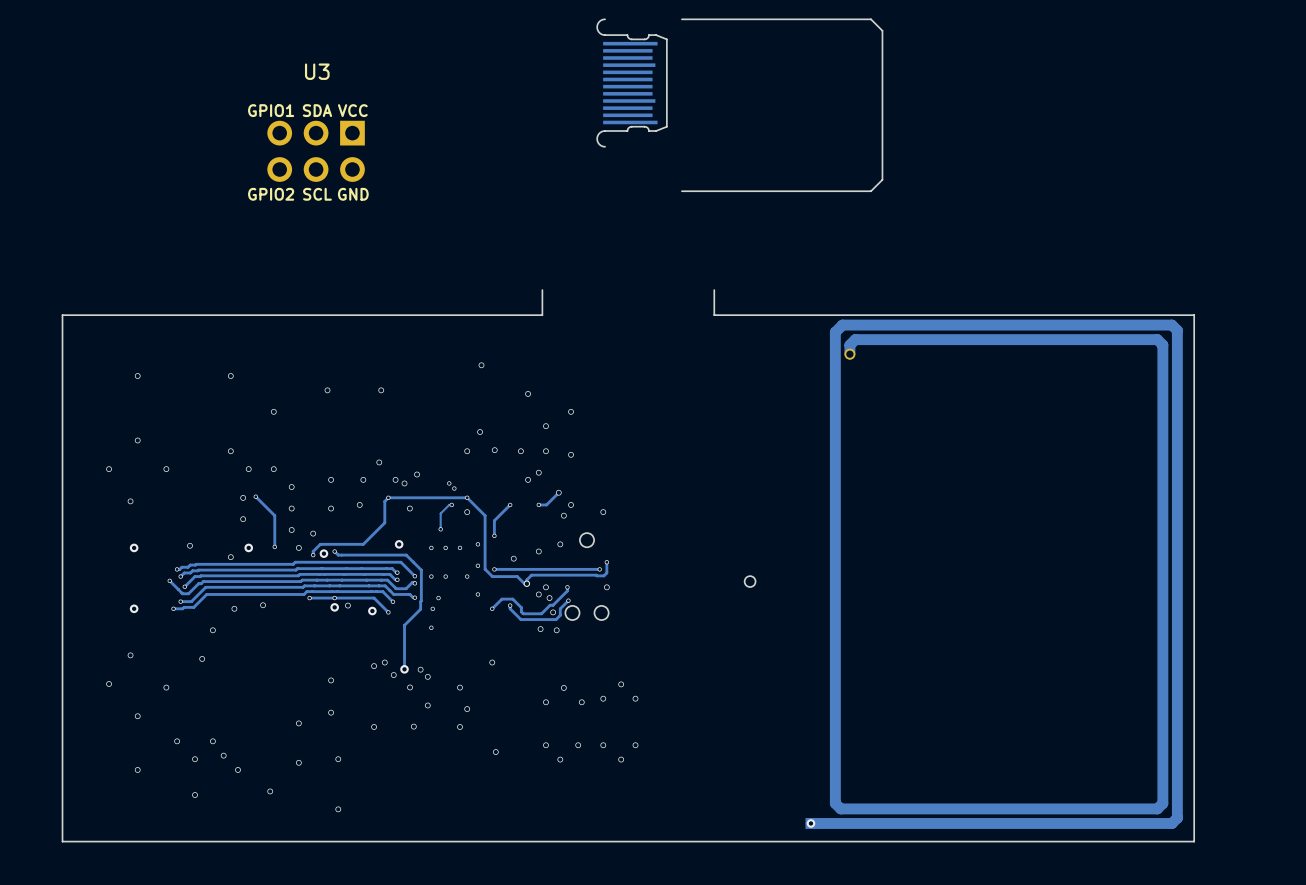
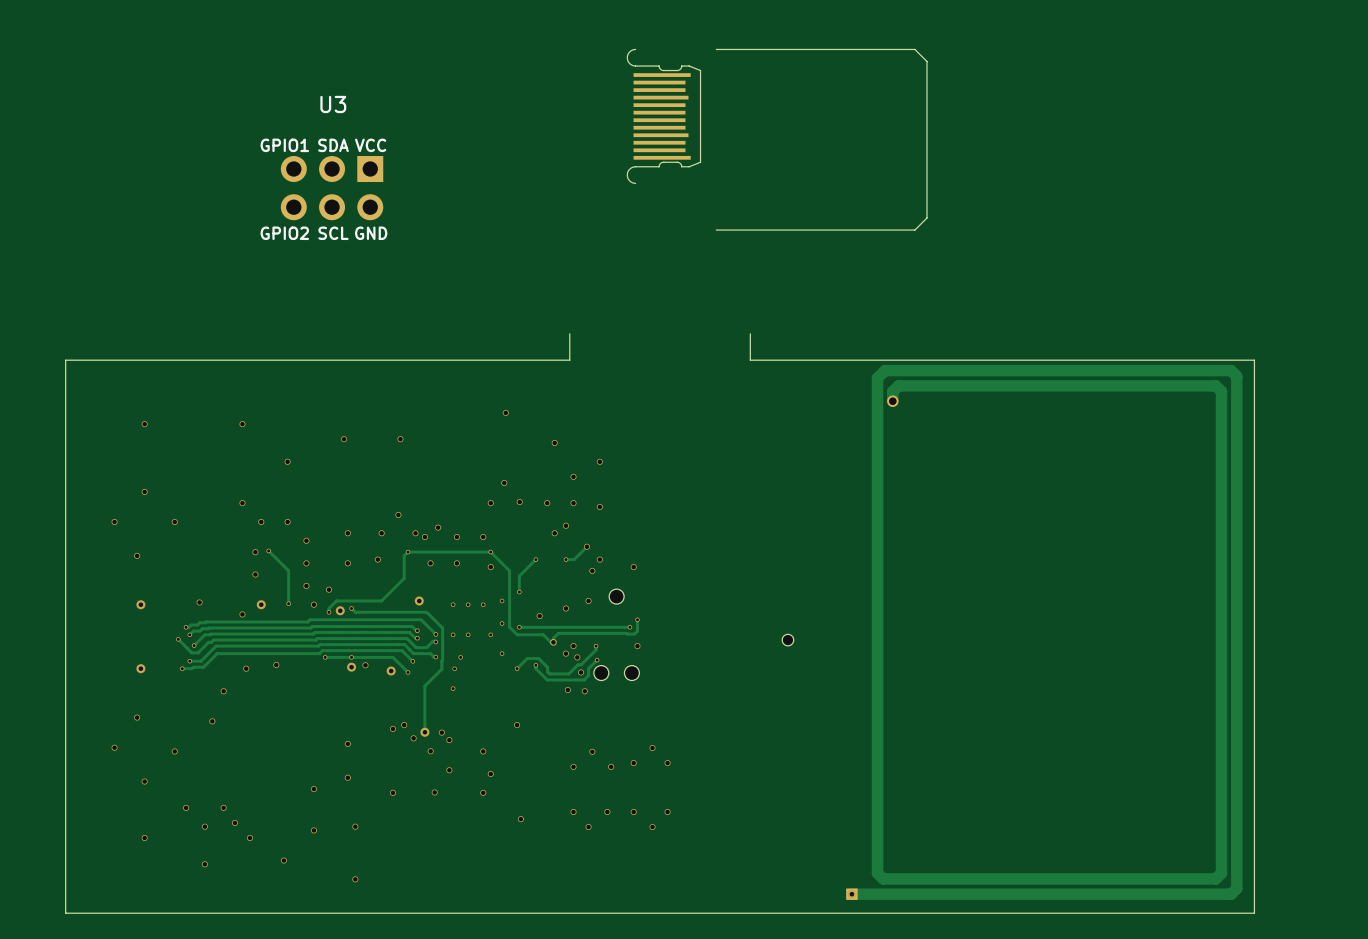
via: none -> (456, 537)
via: (449, 483) -> none
via: none -> (483, 537)
via: (454, 488) -> none
track: (451, 504) (449, 504) (440, 513) (440, 529) -> none
via: (451, 504) -> none
via: none -> (456, 563)
via: (440, 529) -> none

